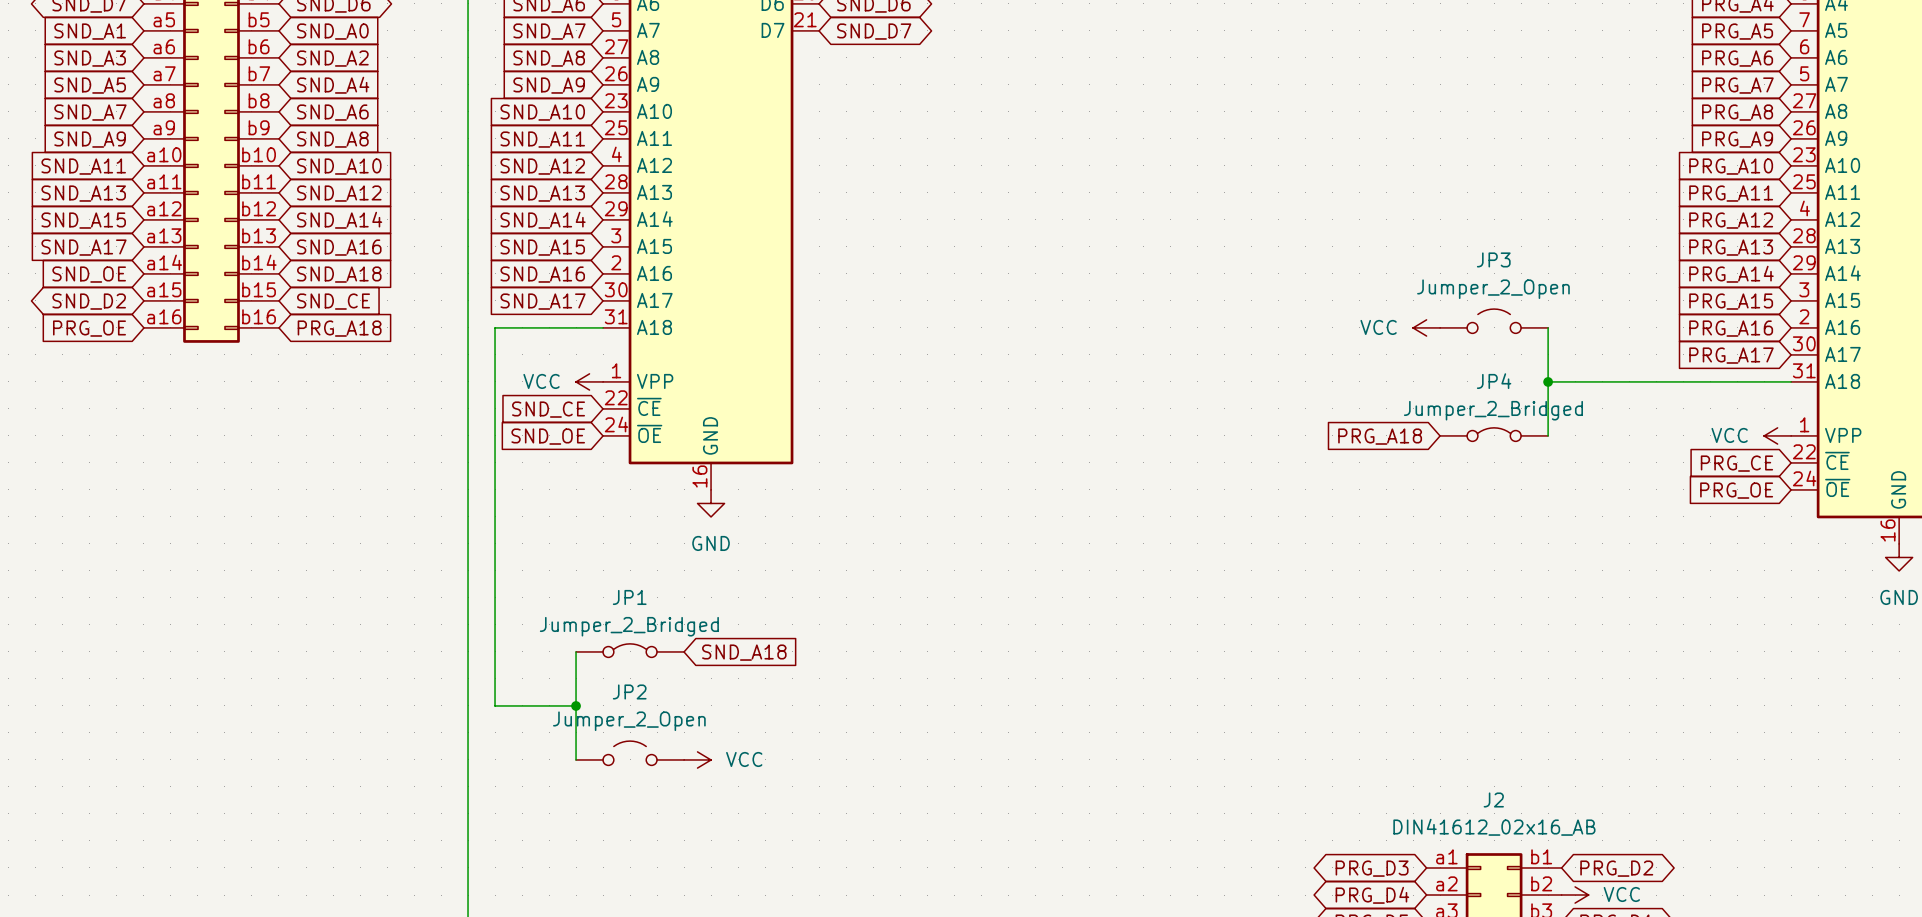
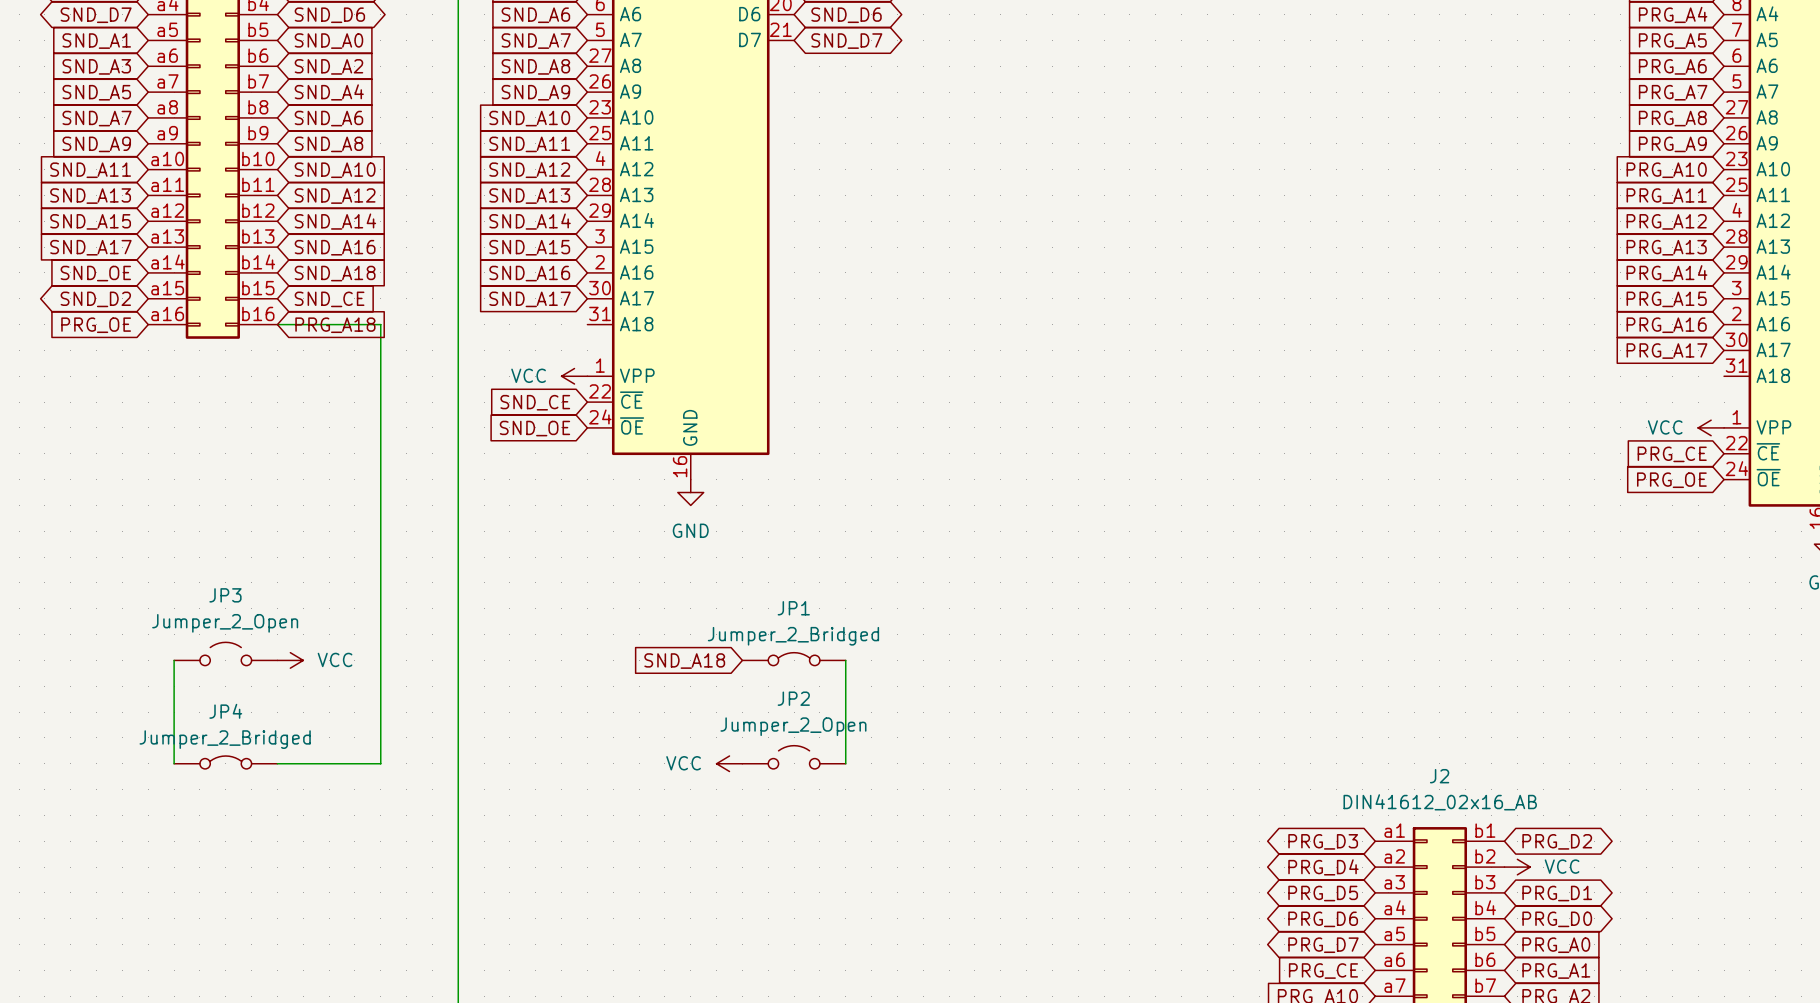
JP3 position: (1494, 321) -> (225, 653)
wire: none -> (277, 324) (380, 324) (380, 763) (277, 763)
wire: (603, 327) (495, 327) (495, 705) (576, 705) -> none
power symbol: VCC (1426, 327) -> none
wire: (1548, 327) (1548, 435) -> none
wire: (1548, 381) (1791, 381) -> none
junction: (1548, 381) -> none
JP4 position: (1494, 434) -> (225, 762)
global label: PRG_A18 (1380, 436) -> none
JP1 position: (630, 650) -> (794, 659)
wire: (576, 651) (576, 759) -> none
global label rotation: 0° (744, 652) -> 180° (684, 661)
wire: none -> (174, 660) (174, 763)
power symbol: none -> VCC (290, 660)
wire: none -> (845, 660) (845, 763)
junction: (576, 705) -> none
JP2 position: (630, 753) -> (794, 757)
power symbol rotation: 0° (697, 759) -> 180° (729, 763)
power symbol position: VCC (697, 759) -> VCC (729, 763)

